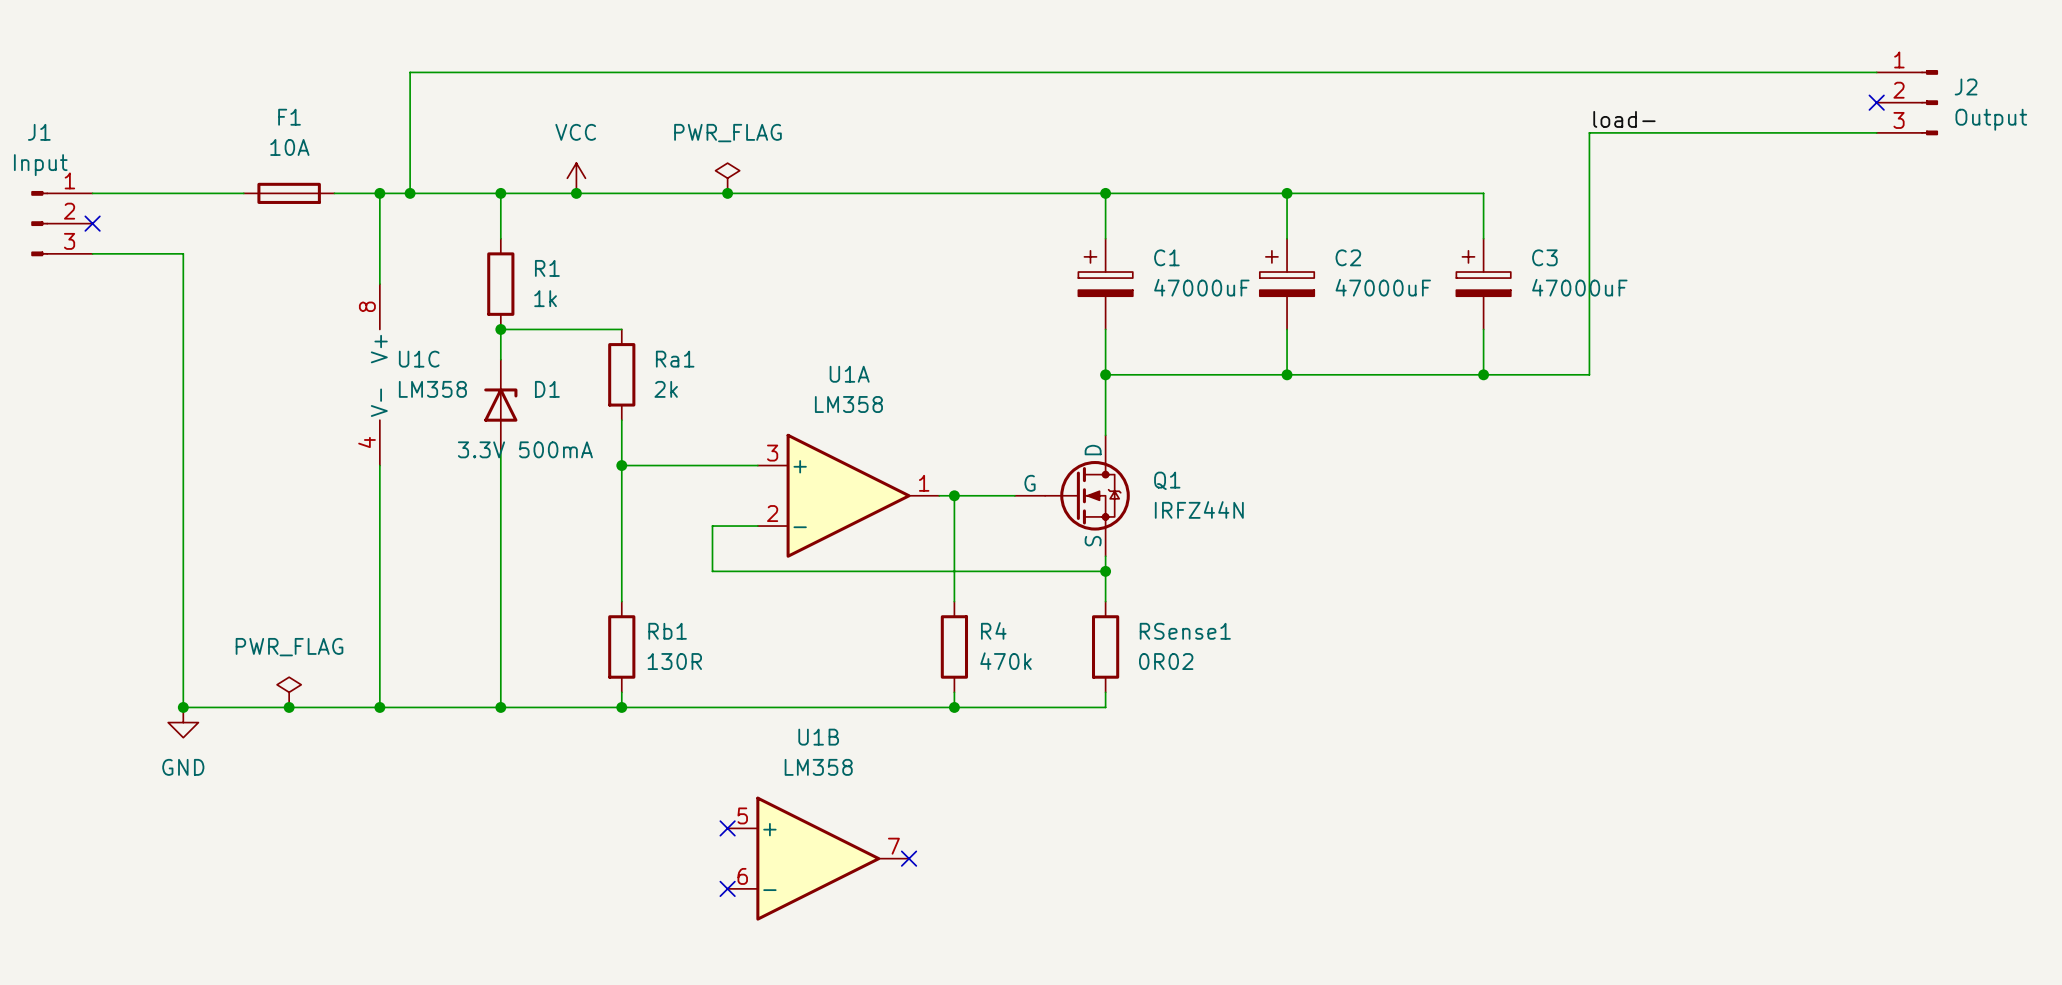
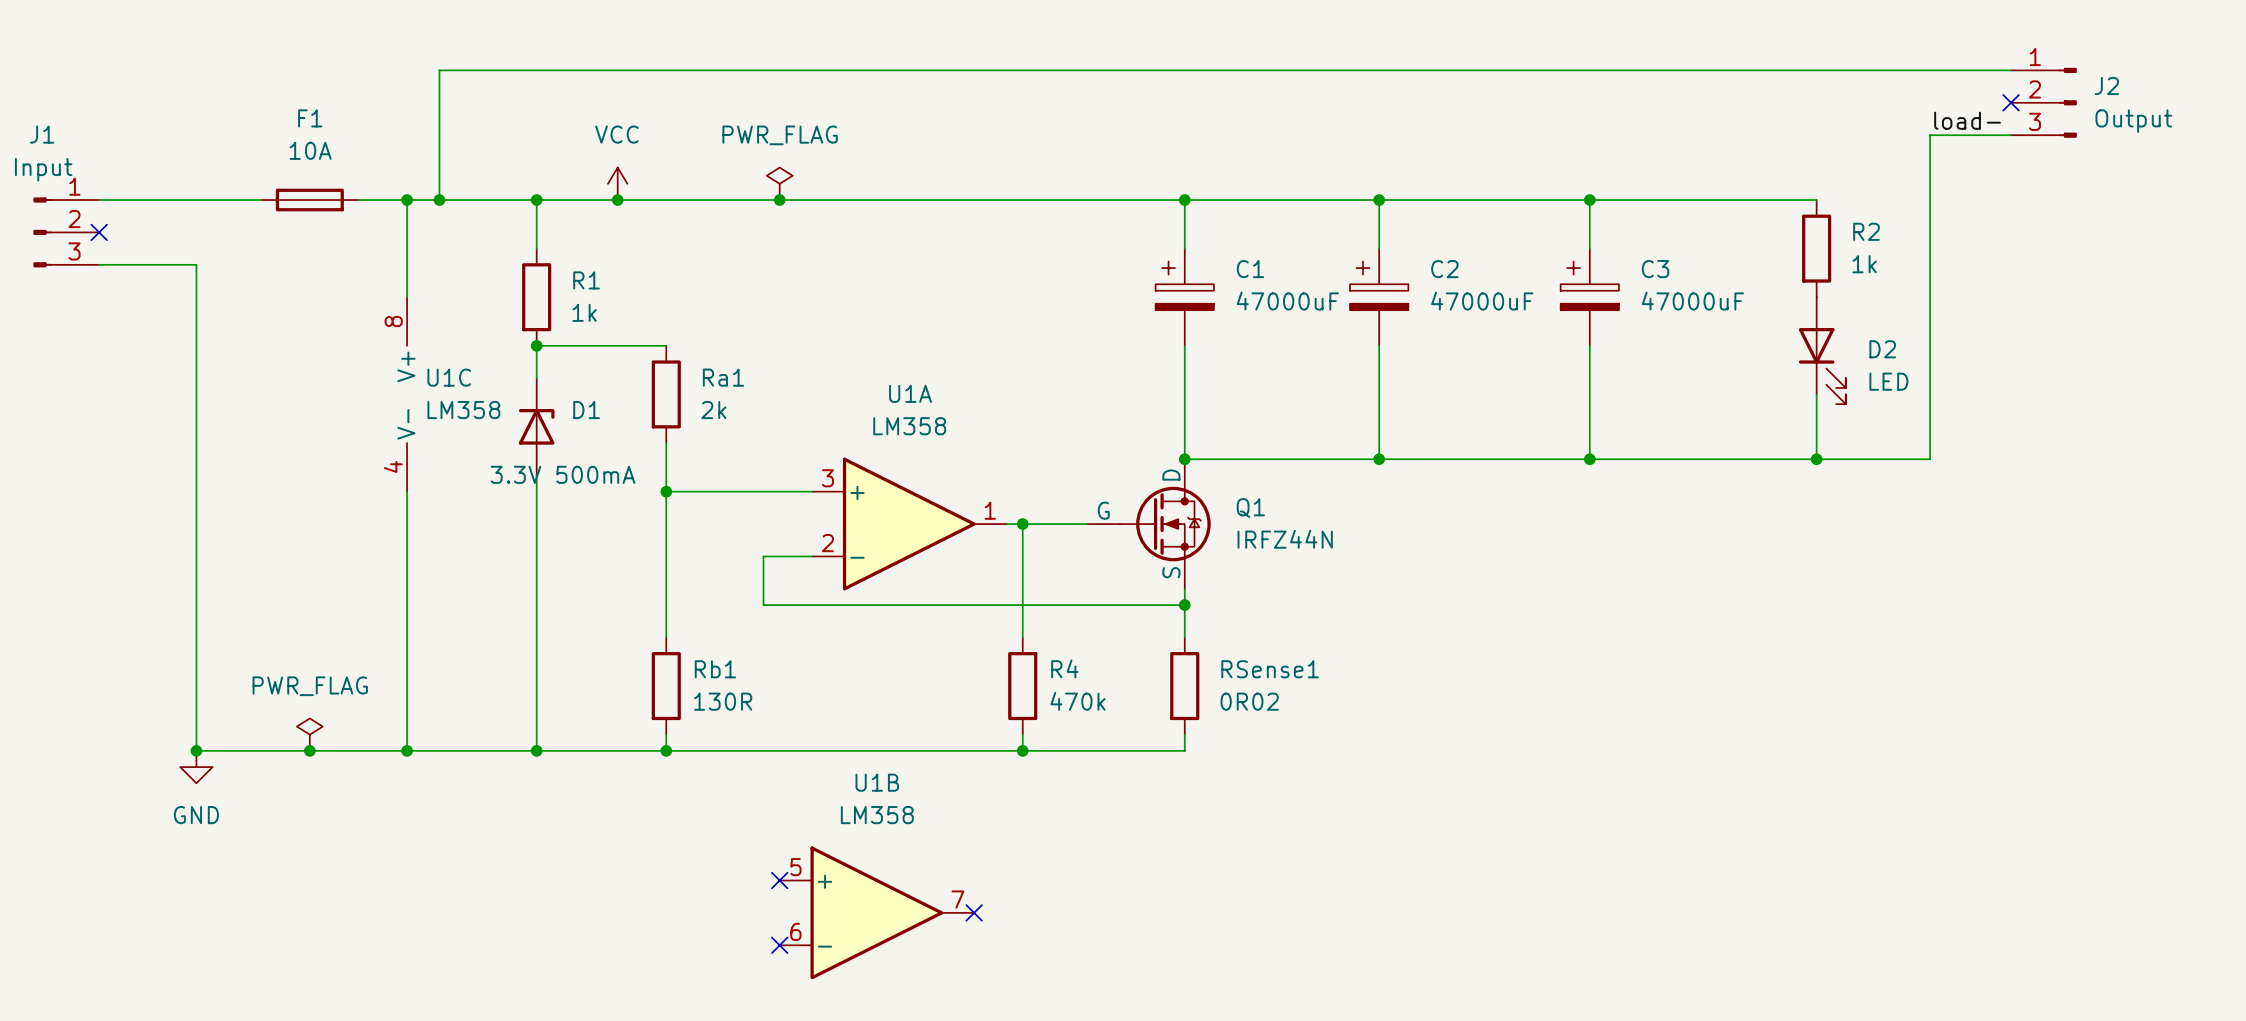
label position: load- (1624, 119) -> load- (1967, 120)
wire: (1801, 132) (1589, 132) (1589, 374) (1105, 374) -> (1930, 135) (1930, 459) (1184, 459)
wire: none -> (1589, 200) (1816, 200)
junction: none -> (1589, 200)
R2: none -> 1k (1816, 248)
D2: none -> LED (1822, 350)
junction position: (1105, 374) -> (1184, 459)
wire: none -> (1379, 394) (1379, 459)
junction position: (1287, 374) -> (1379, 459)
wire: none -> (1589, 394) (1589, 459)
junction position: (1483, 374) -> (1589, 459)
wire: none -> (1816, 394) (1816, 459)
junction: none -> (1816, 459)

